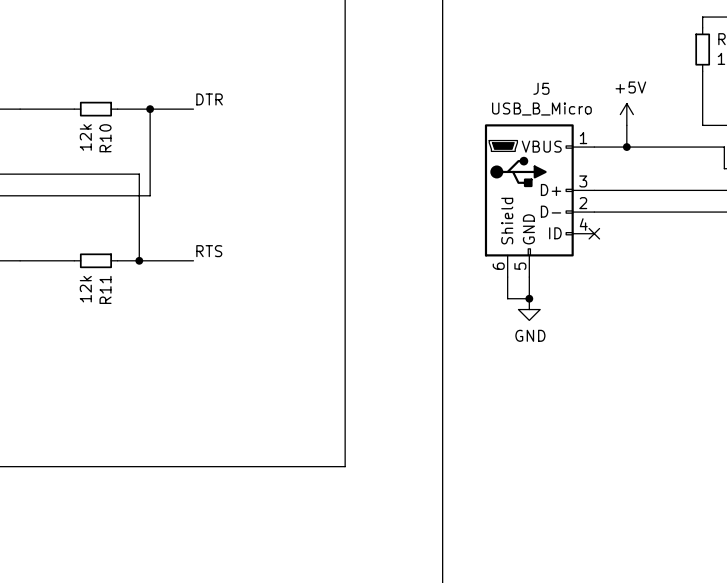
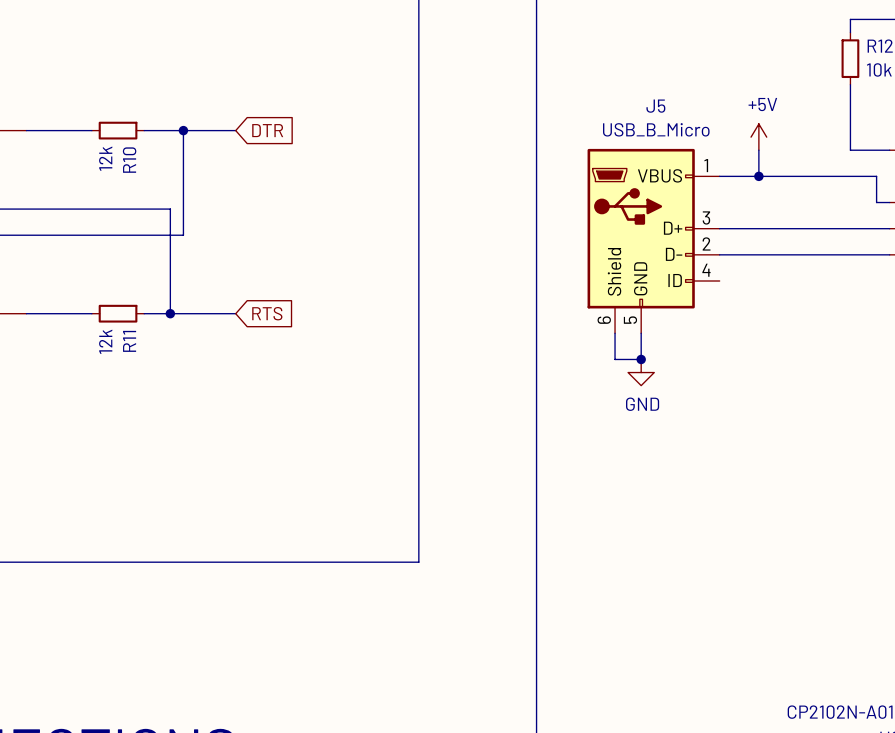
label: DTR (209, 99) -> none
global label: none -> DTR (267, 130)
no-connect mark: (594, 233) -> none
label: RTS (209, 251) -> none
global label: none -> RTS (267, 313)

